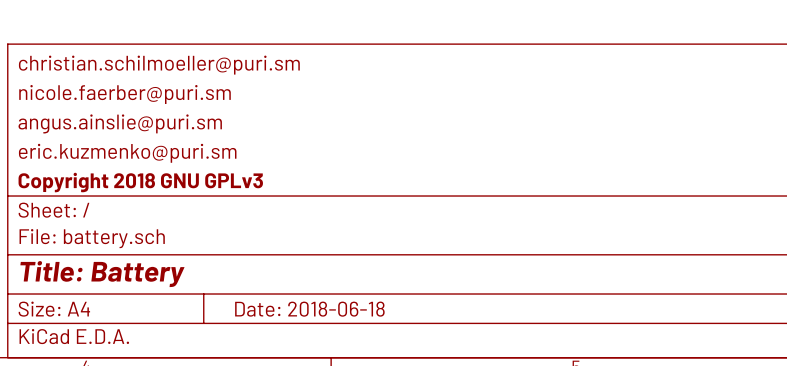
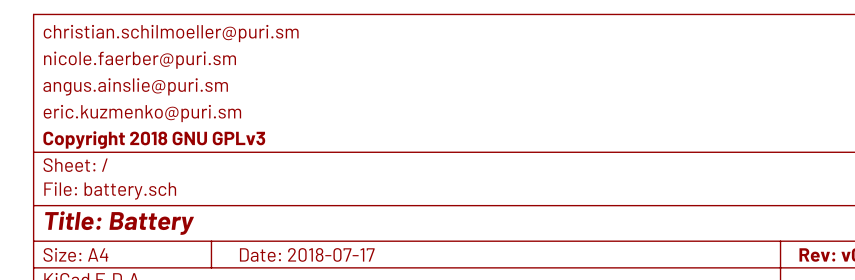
title block: Date: 2018-06-18 (309, 309) -> Date: 2018-07-17 (307, 254)

